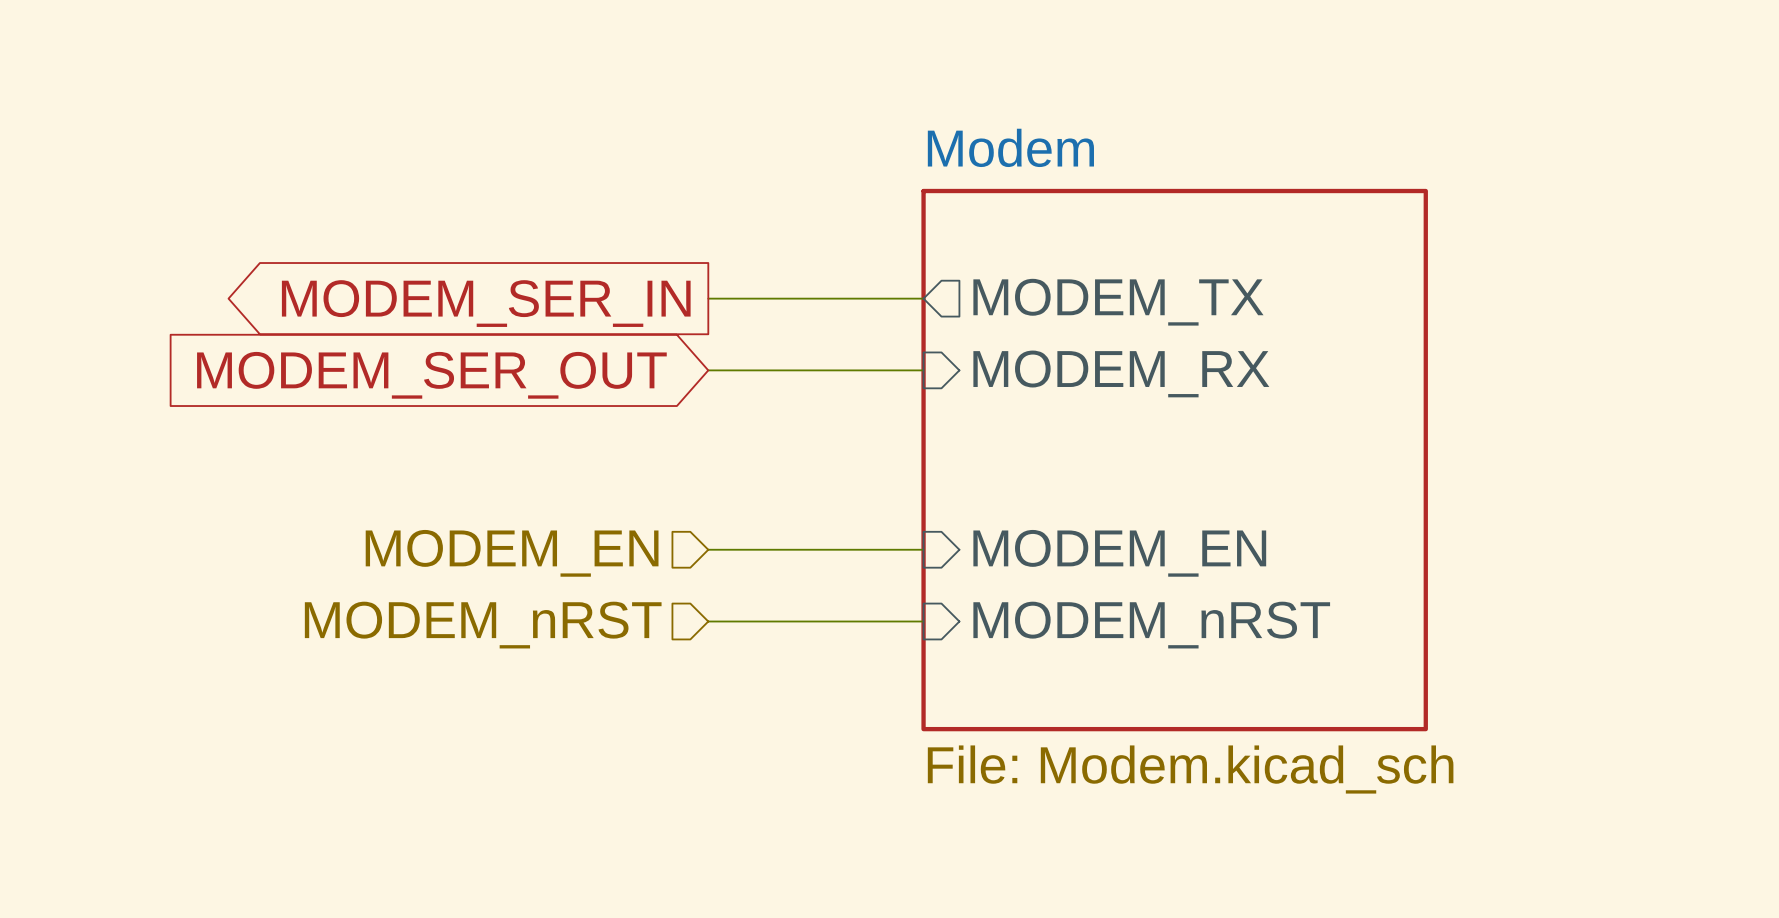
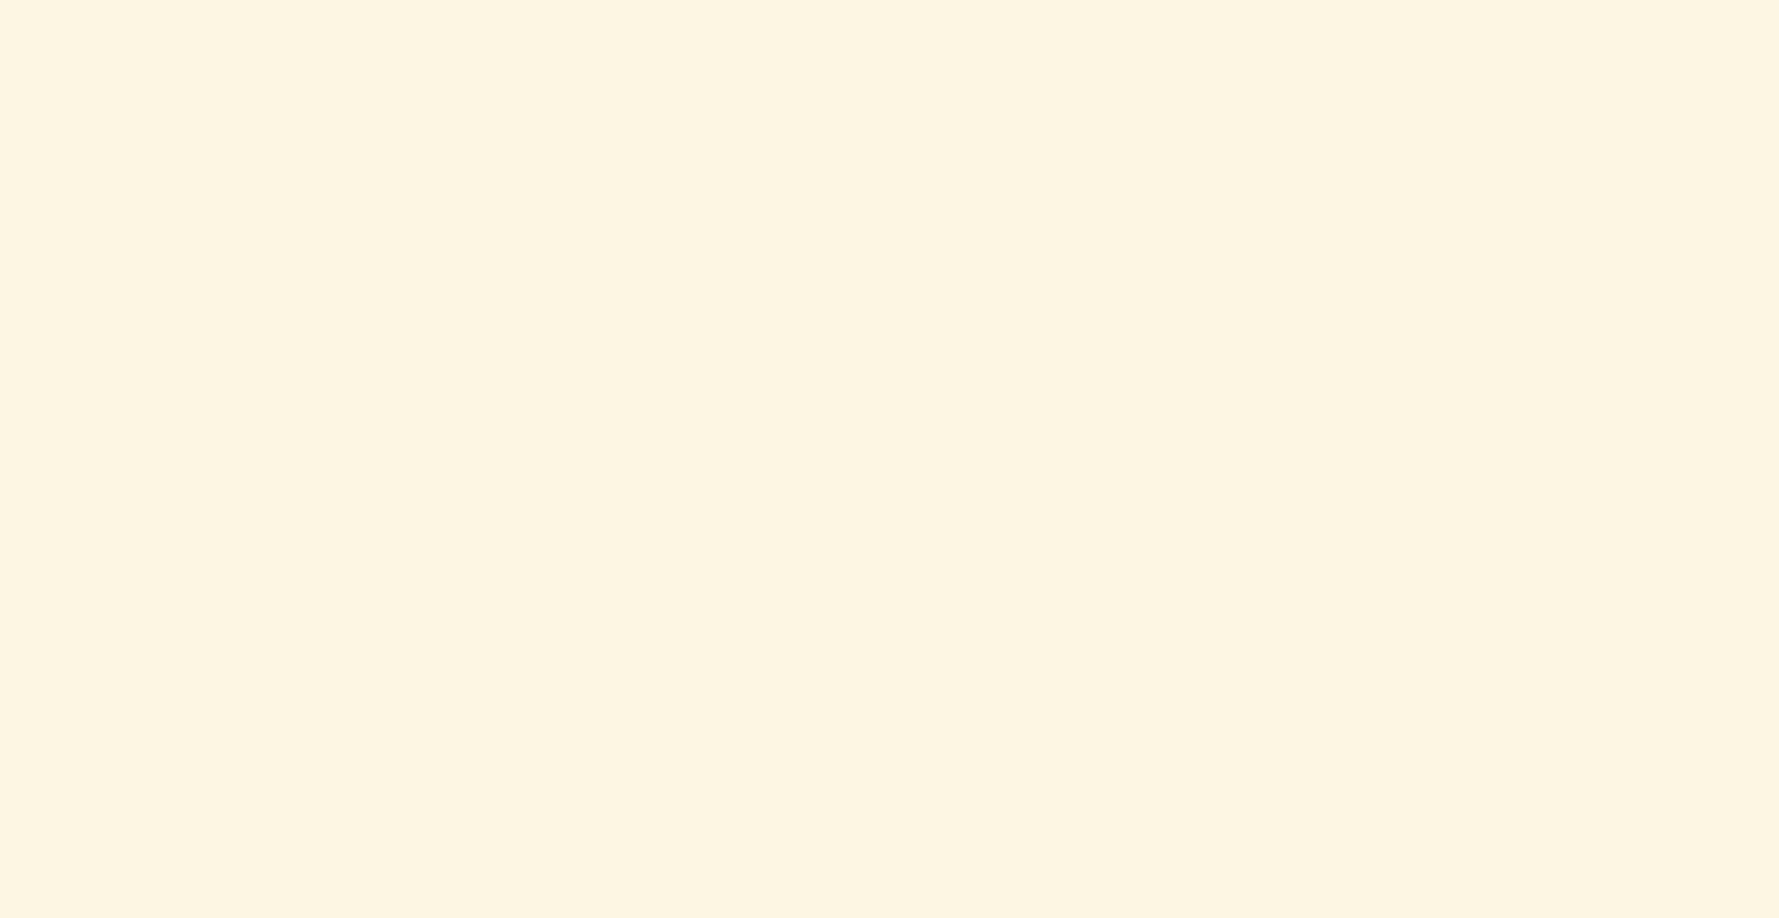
wire: (708, 298) (923, 298) -> none
sheet pin: MODEM_TX (1118, 302) -> none
global label: MODEM_SER_IN (486, 303) -> none
wire: (708, 370) (923, 370) -> none
sheet pin: MODEM_RX (1121, 373) -> none
global label: MODEM_SER_OUT (431, 375) -> none
sheet Modem: File: Modem.kicad_sch (1174, 460) -> none
wire: (708, 549) (923, 549) -> none
hierarchical label: MODEM_EN (512, 553) -> none
sheet pin: MODEM_EN (1119, 553) -> none
wire: (708, 621) (923, 621) -> none
hierarchical label: MODEM_nRST (483, 625) -> none
sheet pin: MODEM_nRST (1151, 625) -> none

